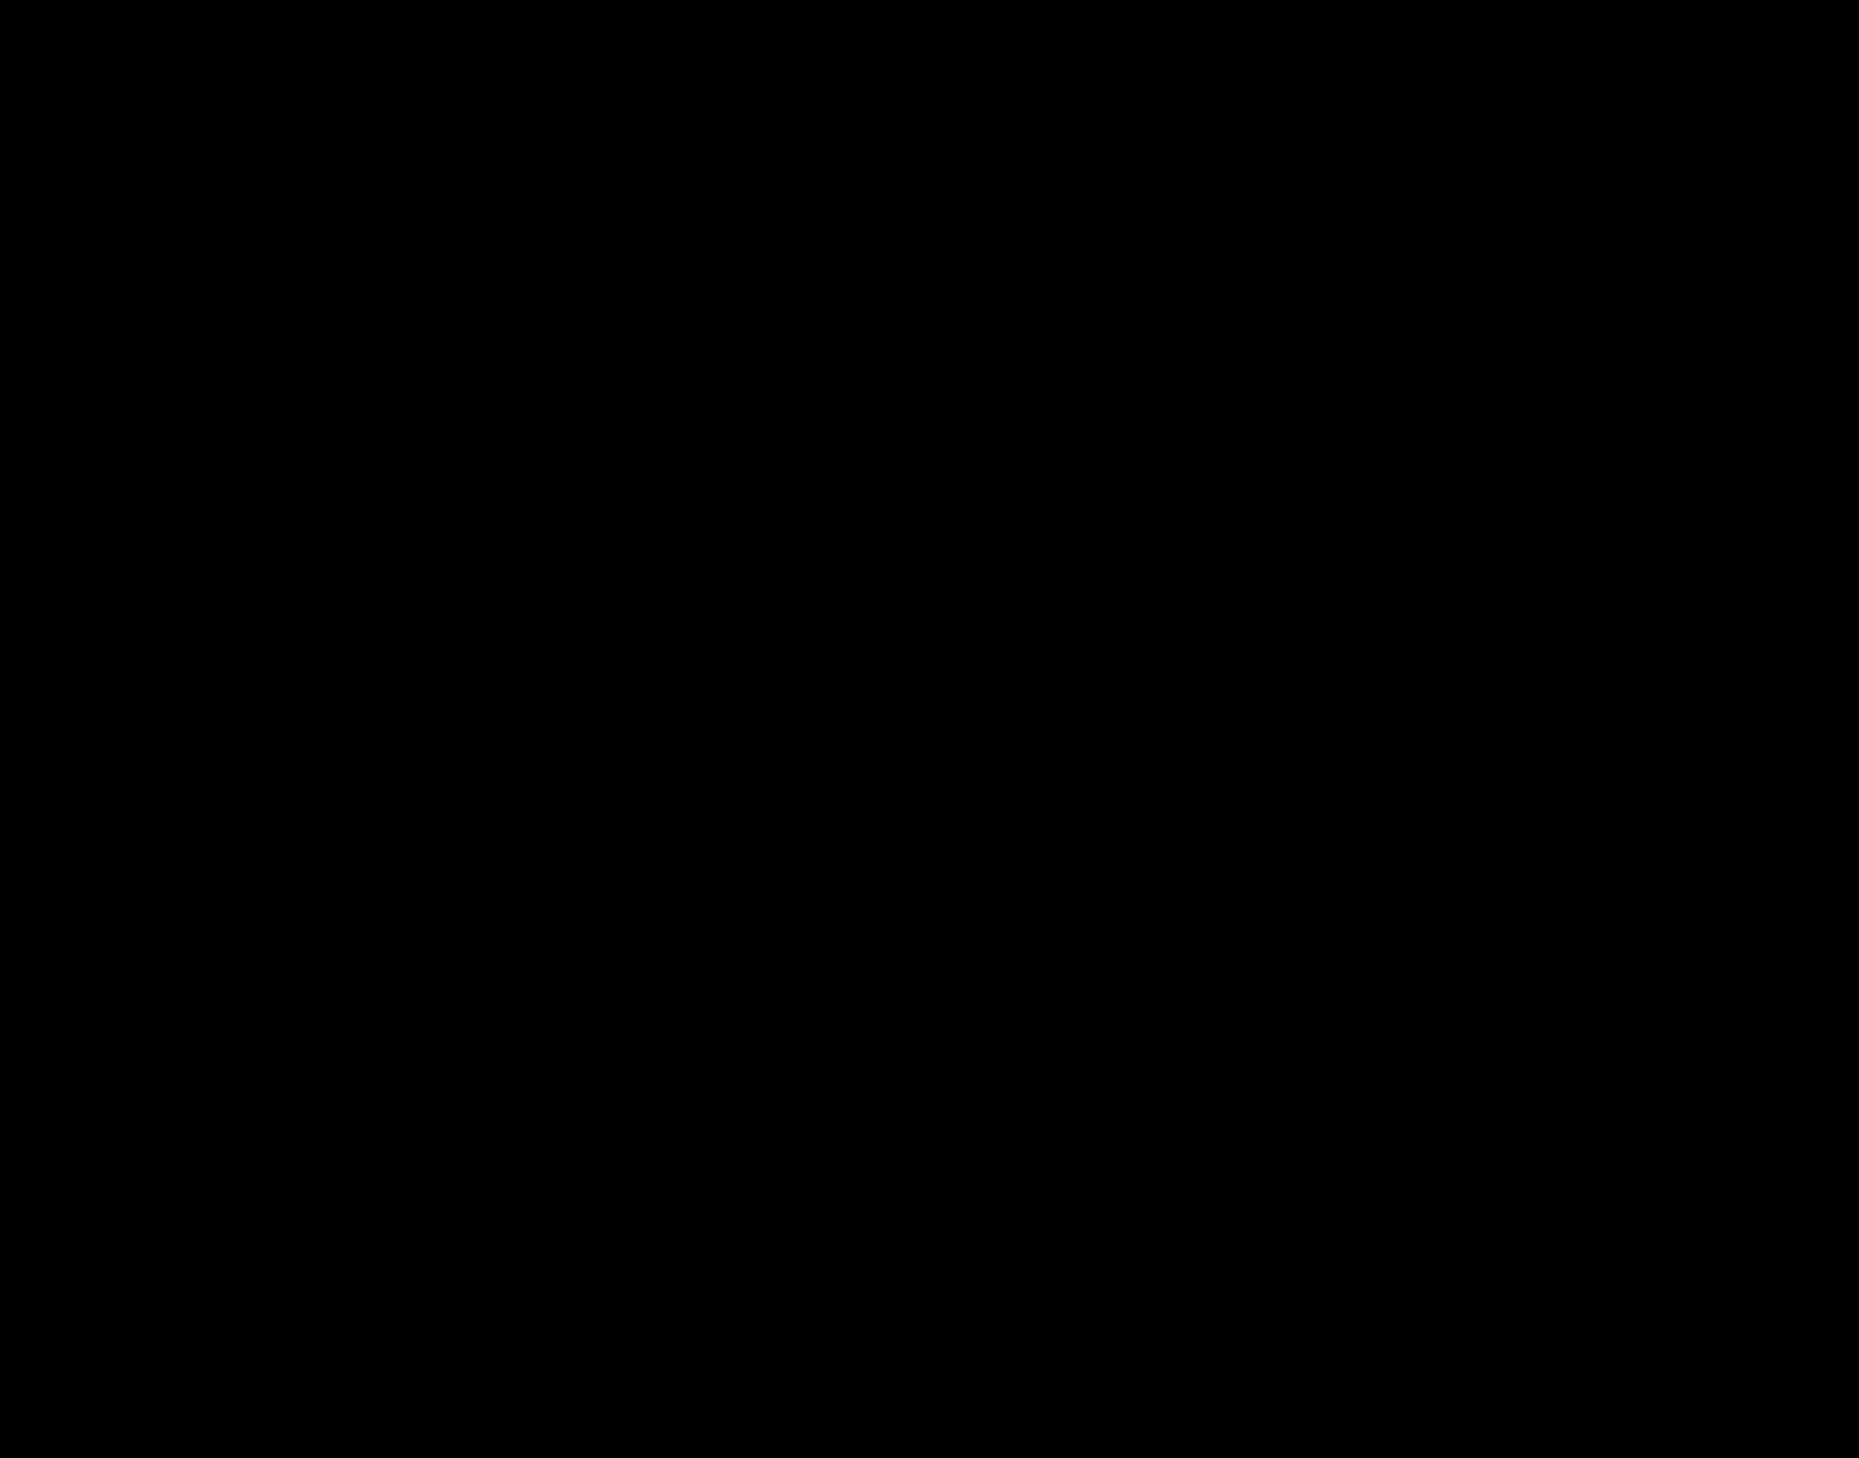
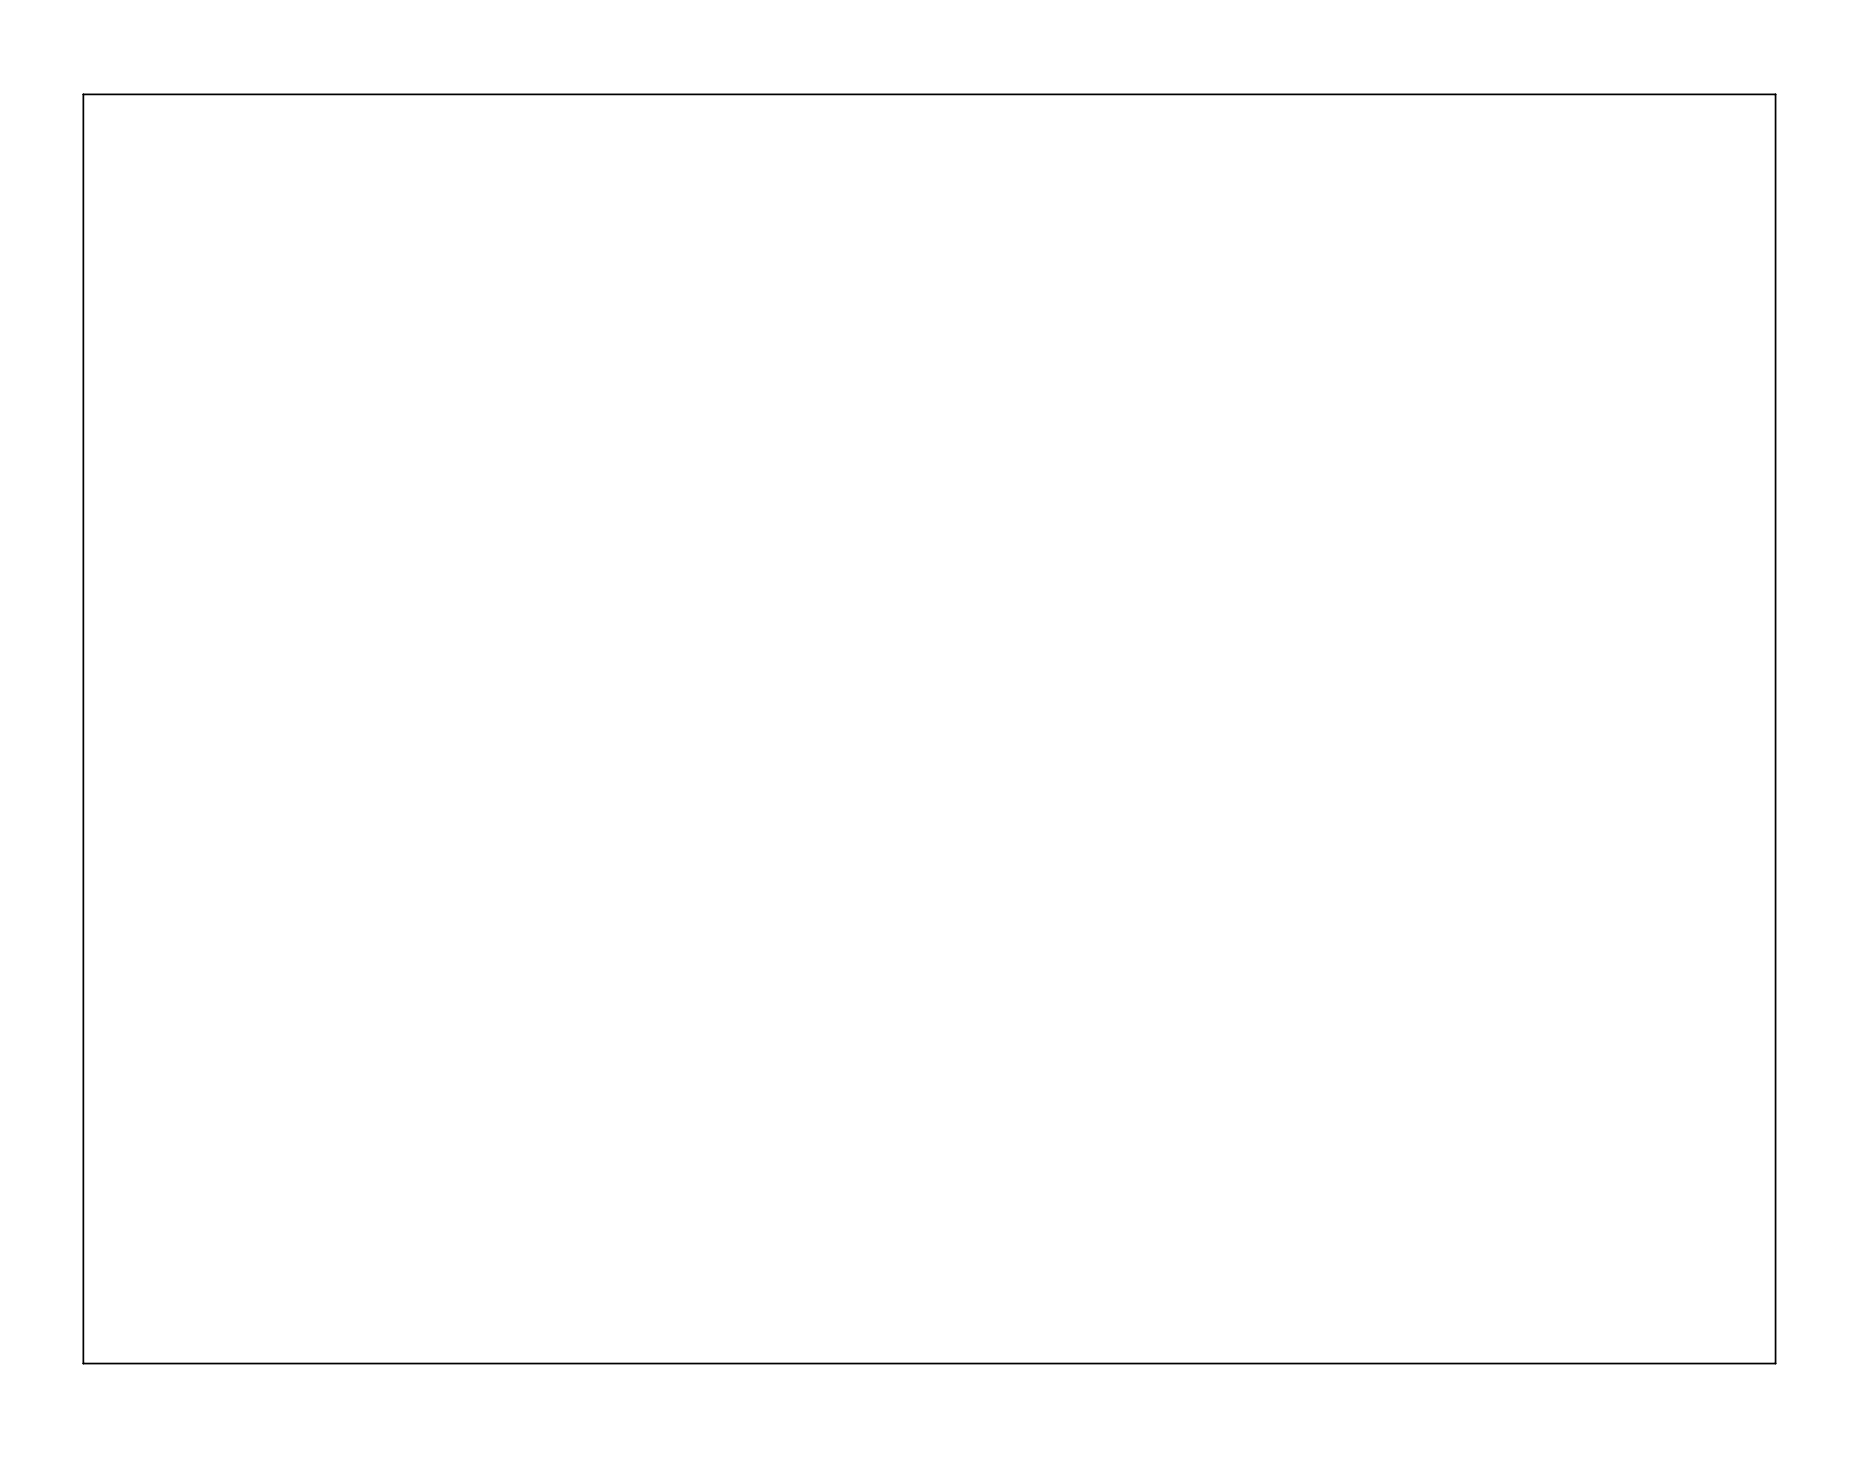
board edge: none -> (1775, 94) (83, 94) (83, 1363) (1775, 1363) (1775, 94)

